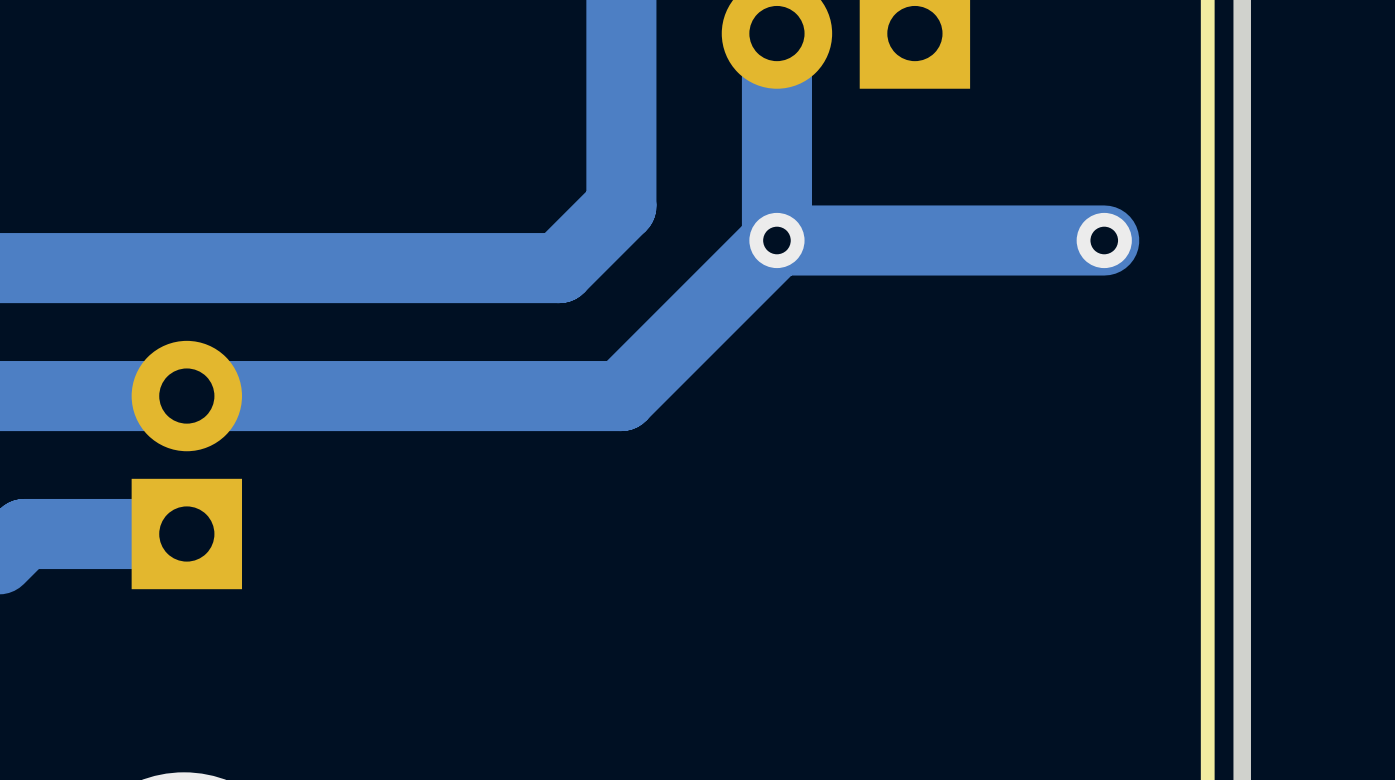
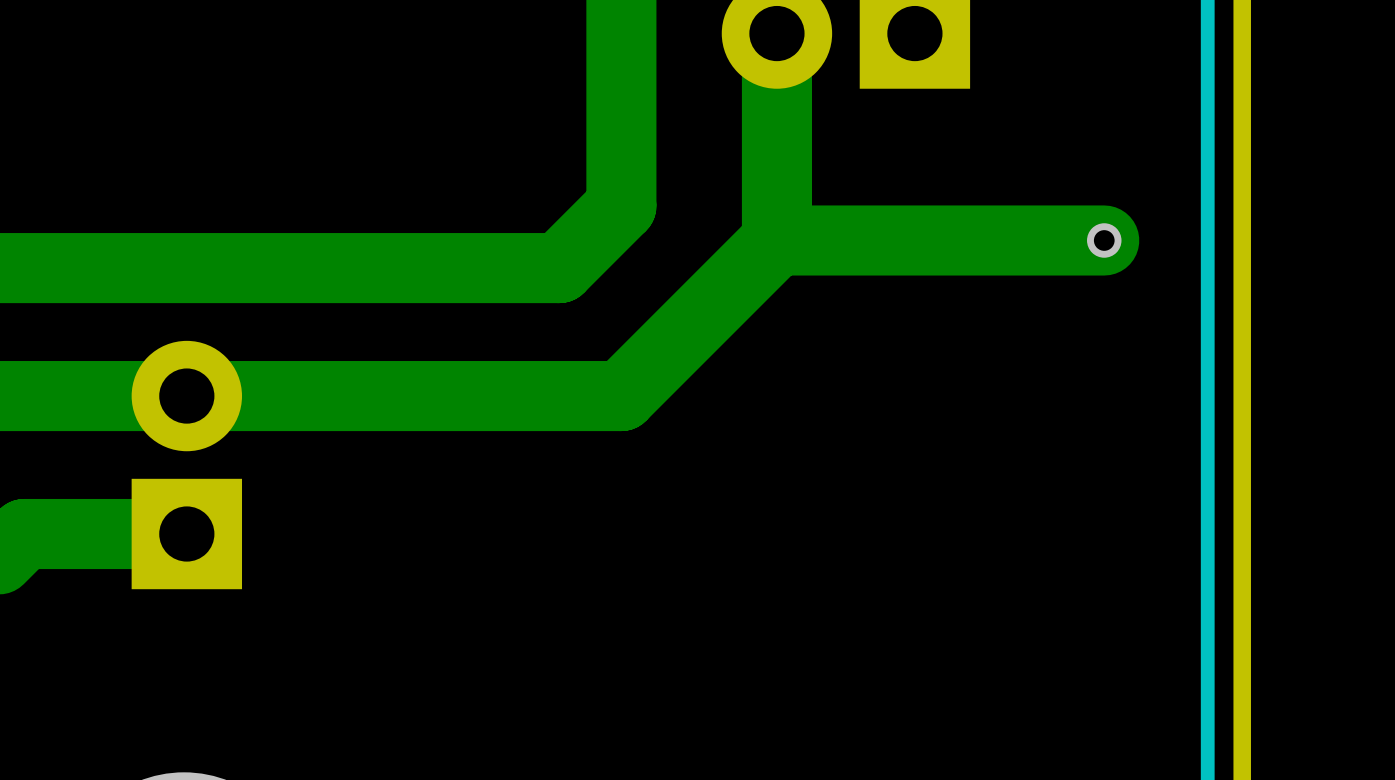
via size: [1076, 212, 1132, 269] -> [1087, 223, 1122, 258]
via: (776, 240) -> none

